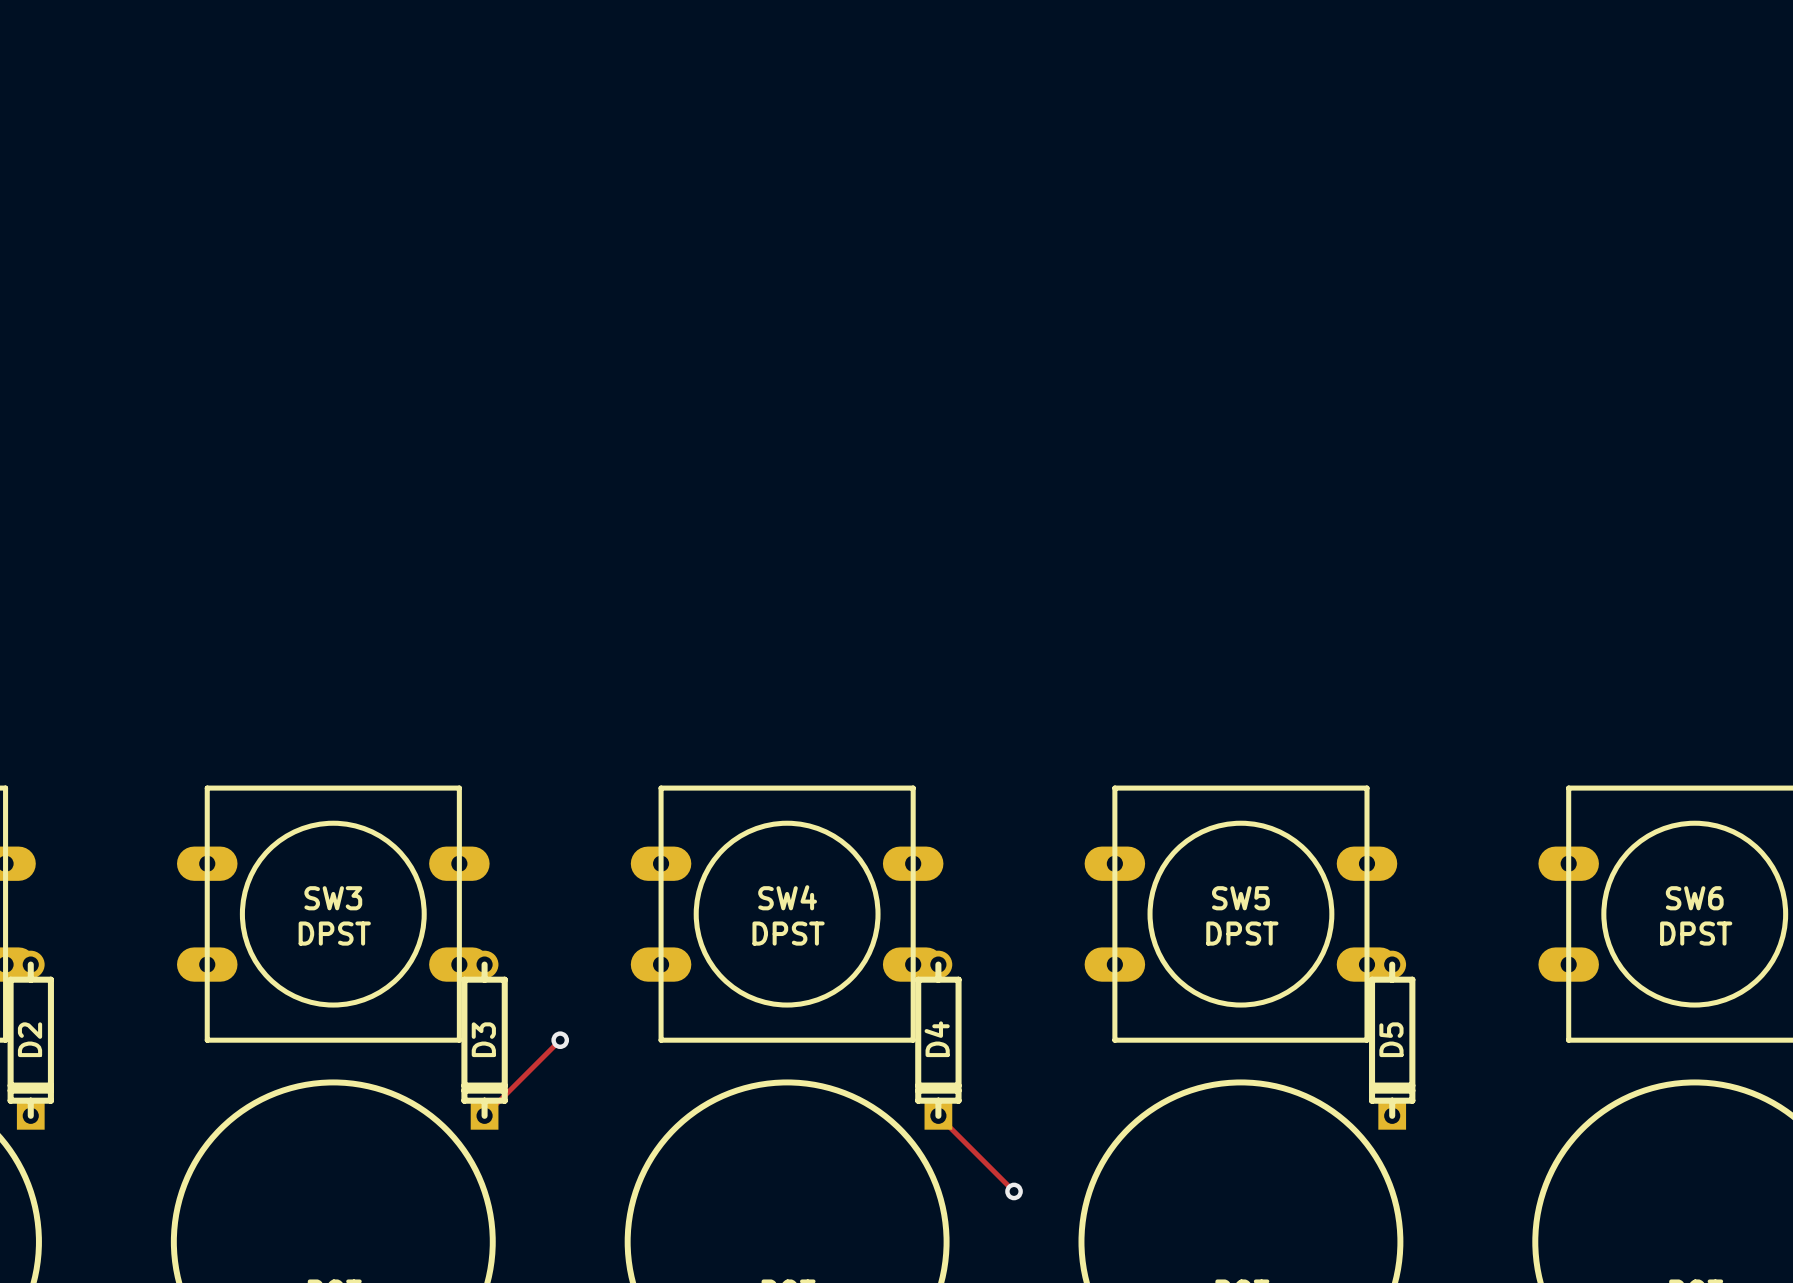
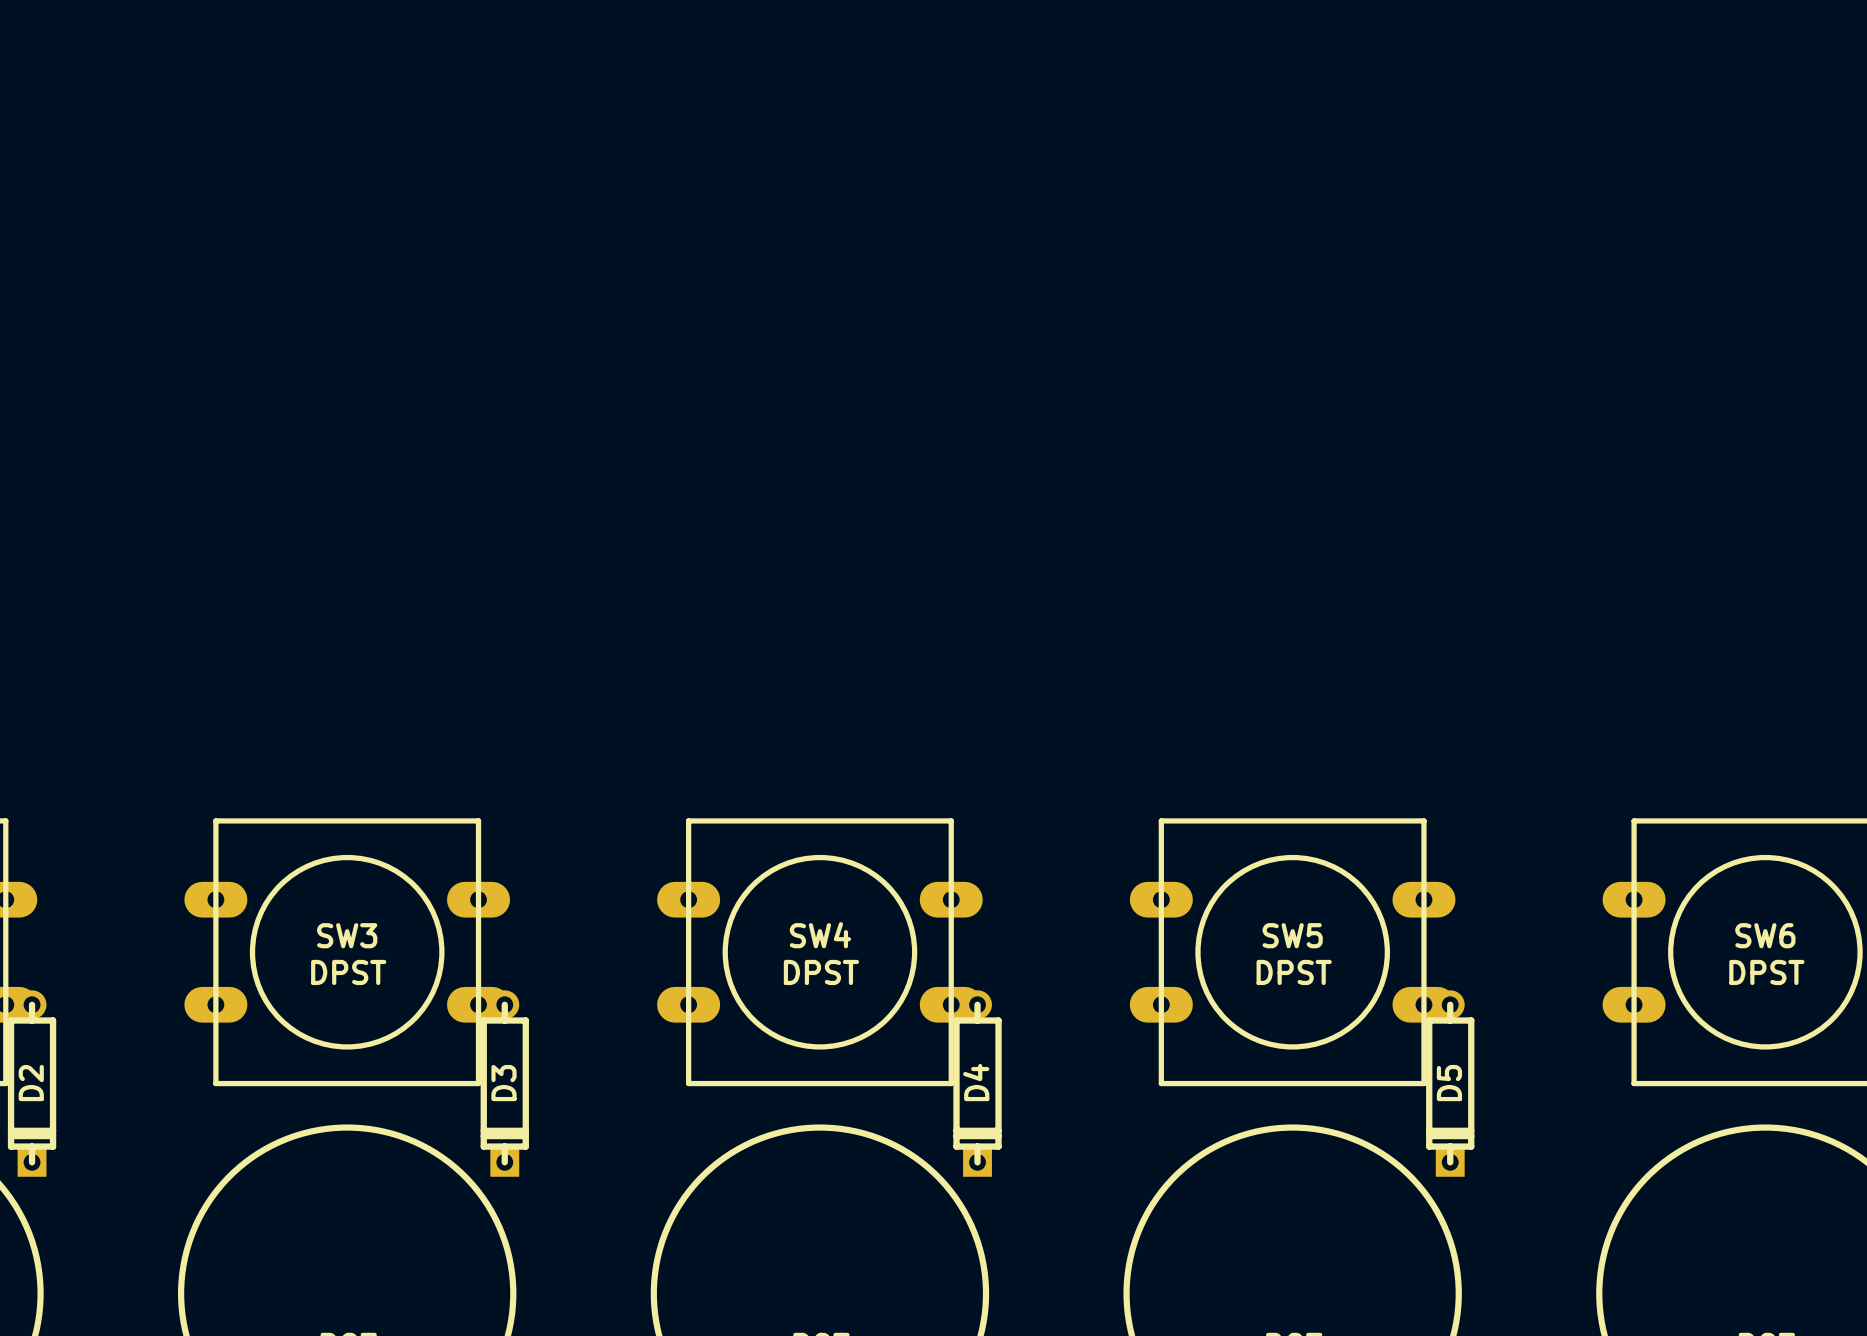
track: (560, 1040) (484, 1115) -> none
via: (560, 1040) -> none
track: (938, 1115) (1014, 1191) -> none
via: (1014, 1191) -> none

